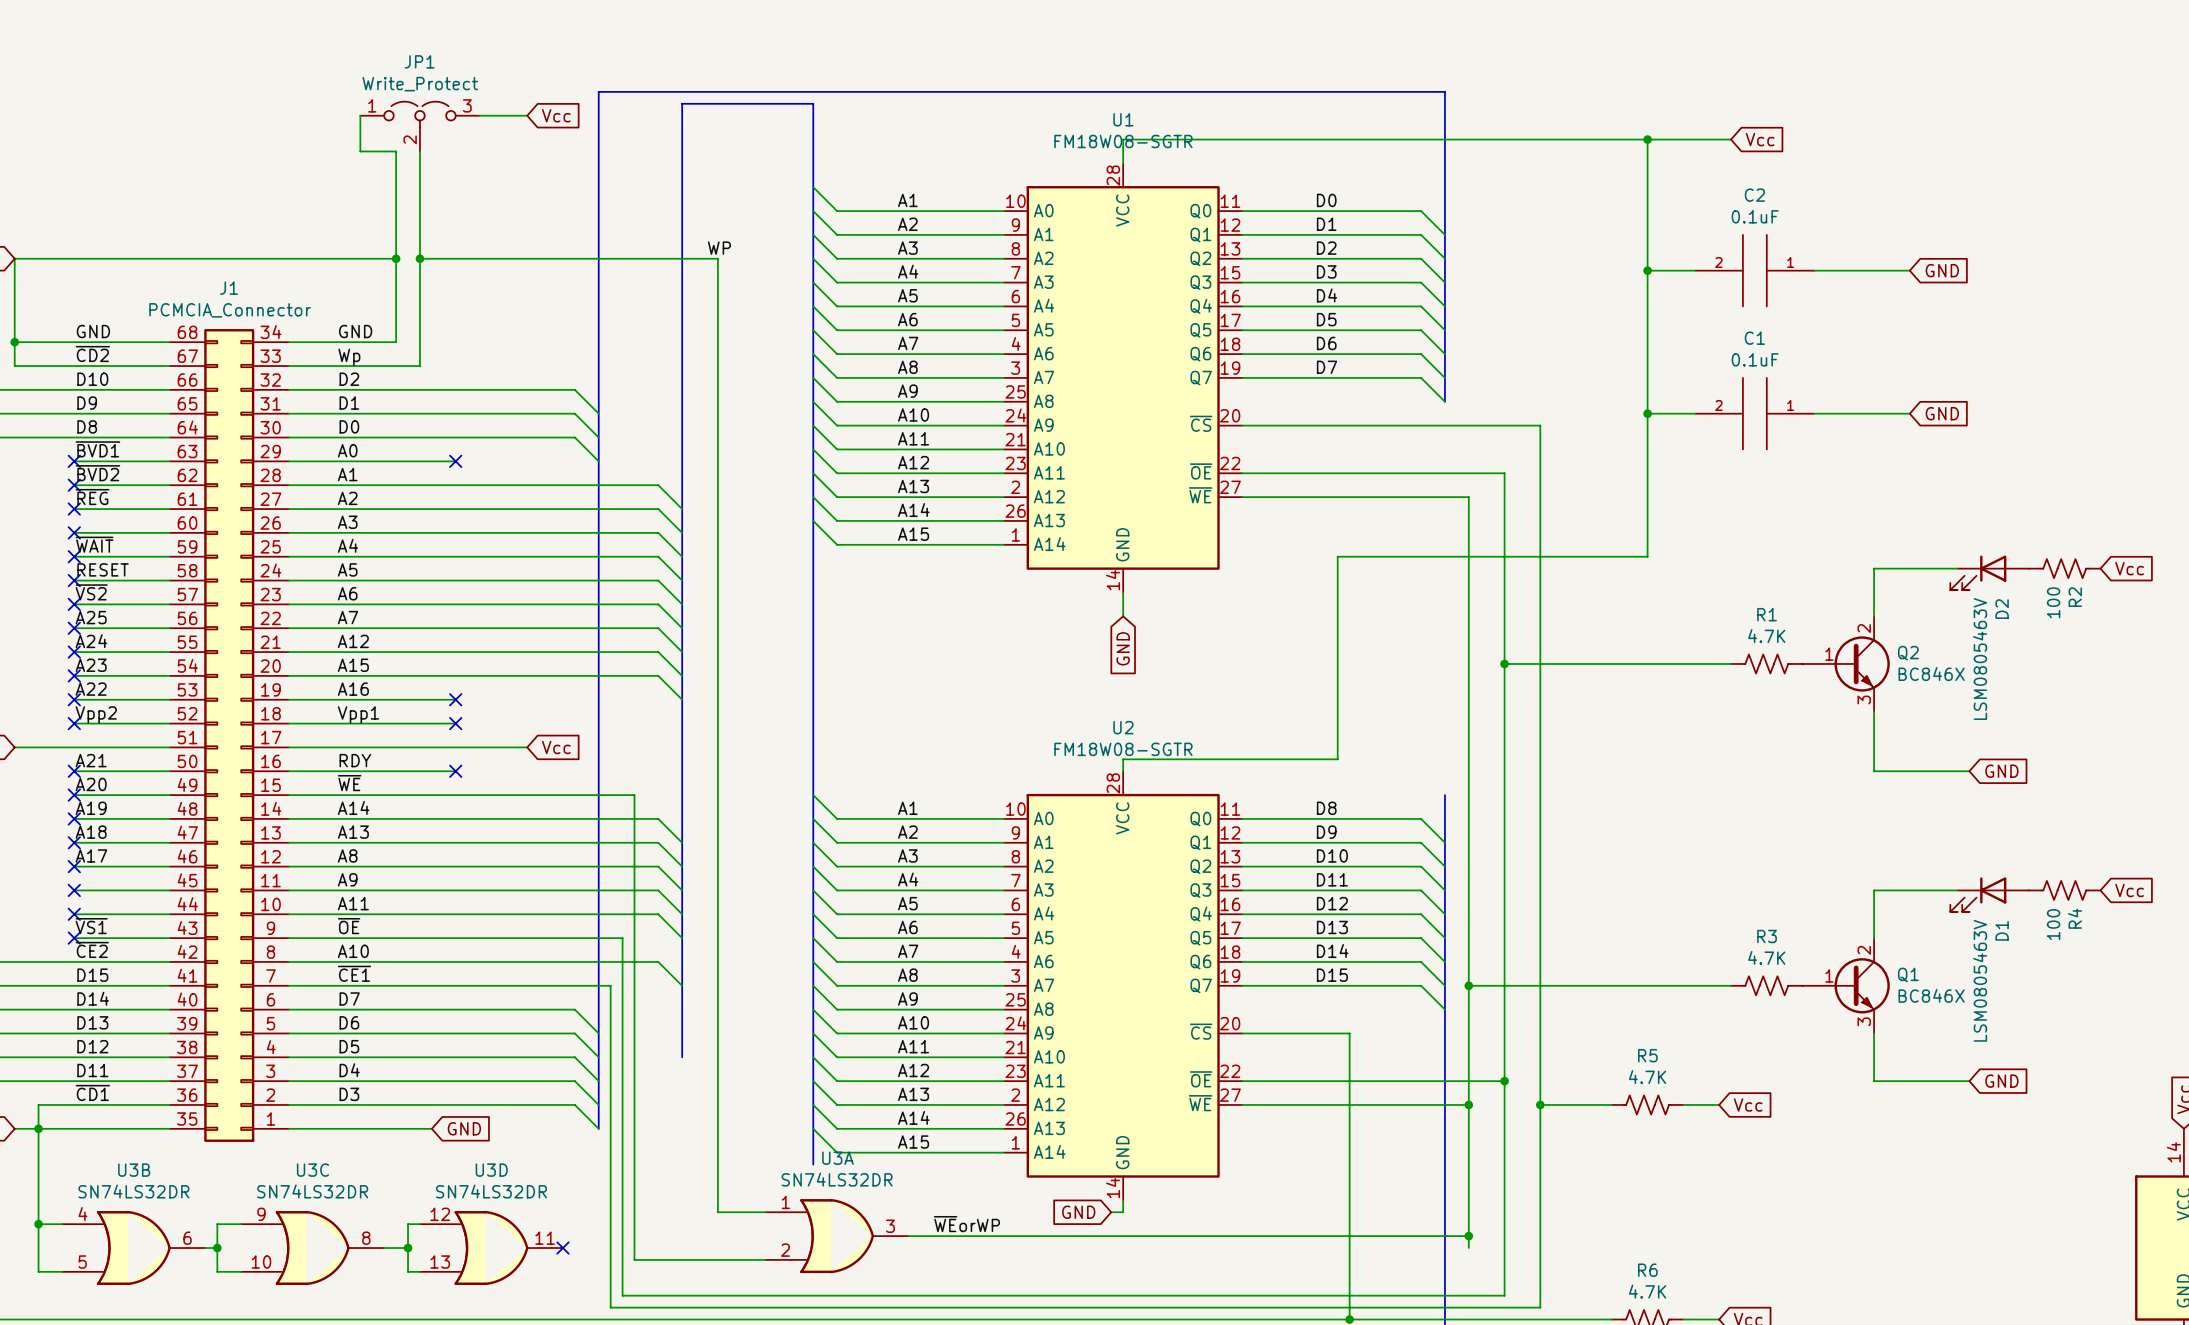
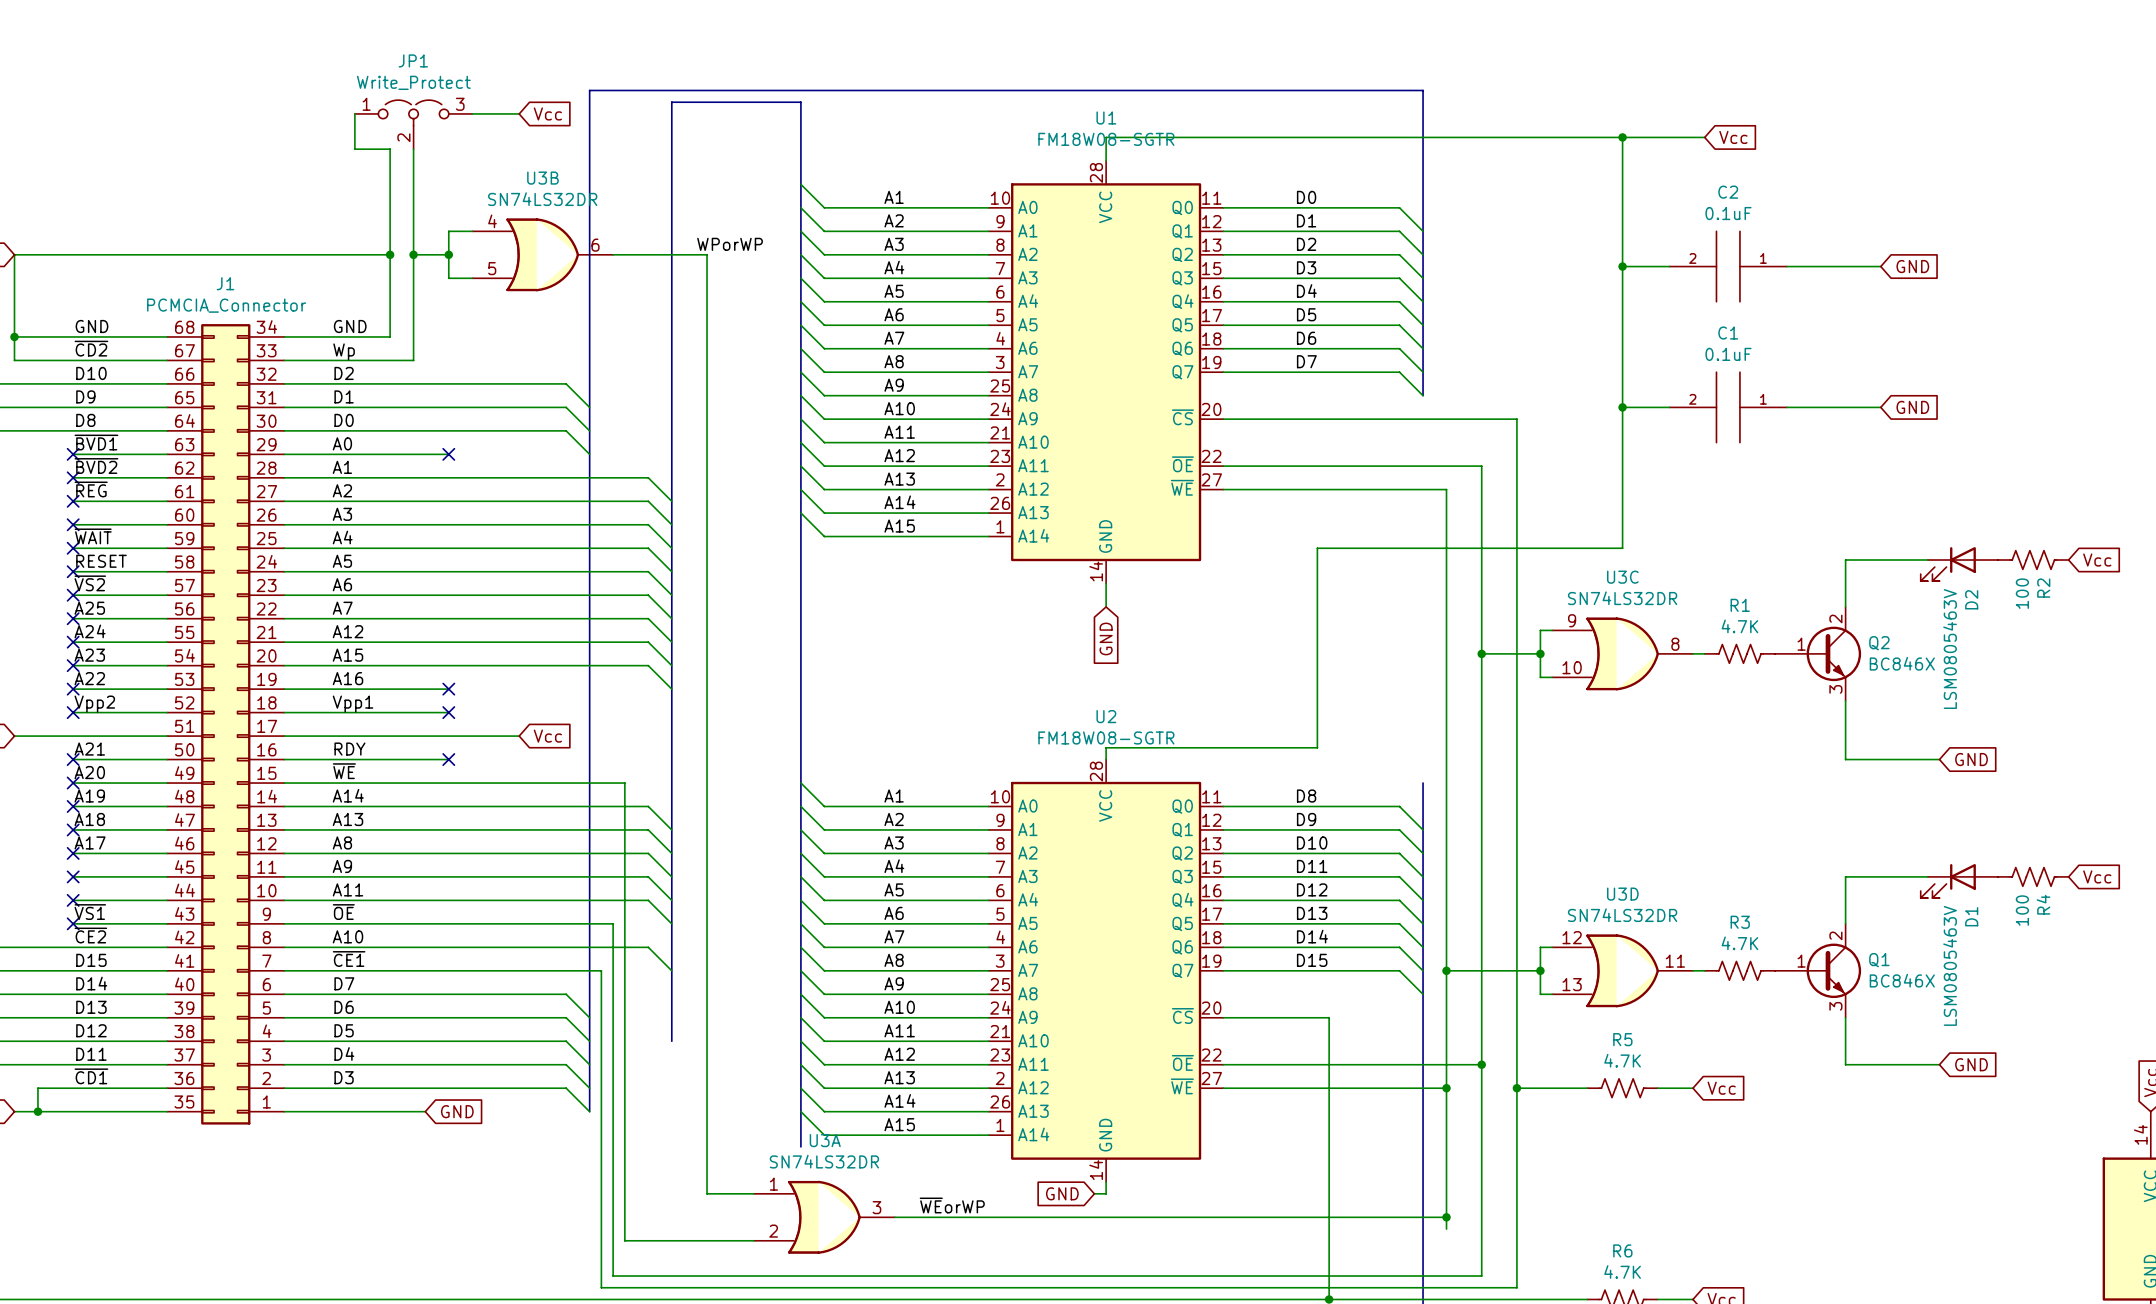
wire: none -> (472, 231) (448, 231) (448, 278) (472, 278)
label: WP (719, 248) -> WPorWP (730, 244)
wire: (455, 258) (622, 258) -> none
junction: none -> (448, 254)
wire: none -> (1552, 630) (1540, 630) (1540, 677) (1552, 677)
wire: (1564, 663) (1719, 663) -> none
junction: none -> (1540, 653)
wire: none -> (1552, 947) (1540, 947) (1540, 994) (1552, 994)
wire: (1564, 985) (1719, 985) -> none
junction: none -> (1540, 970)
wire: (38, 1128) (38, 1271) (62, 1271) -> none
wire: (38, 1224) (62, 1224) -> none
junction: (38, 1224) -> none
wire: (241, 1224) (217, 1224) (217, 1271) (241, 1271) -> none
wire: (419, 1224) (408, 1224) (408, 1271) (419, 1271) -> none
U3B position: (133, 1248) -> (542, 254)
wire: (205, 1248) (217, 1248) -> none
junction: (217, 1248) -> none
U3C position: (312, 1248) -> (1622, 653)
wire: (384, 1248) (408, 1248) -> none
junction: (408, 1248) -> none
U3D position: (491, 1248) -> (1622, 970)
no-connect mark: (562, 1248) -> none

